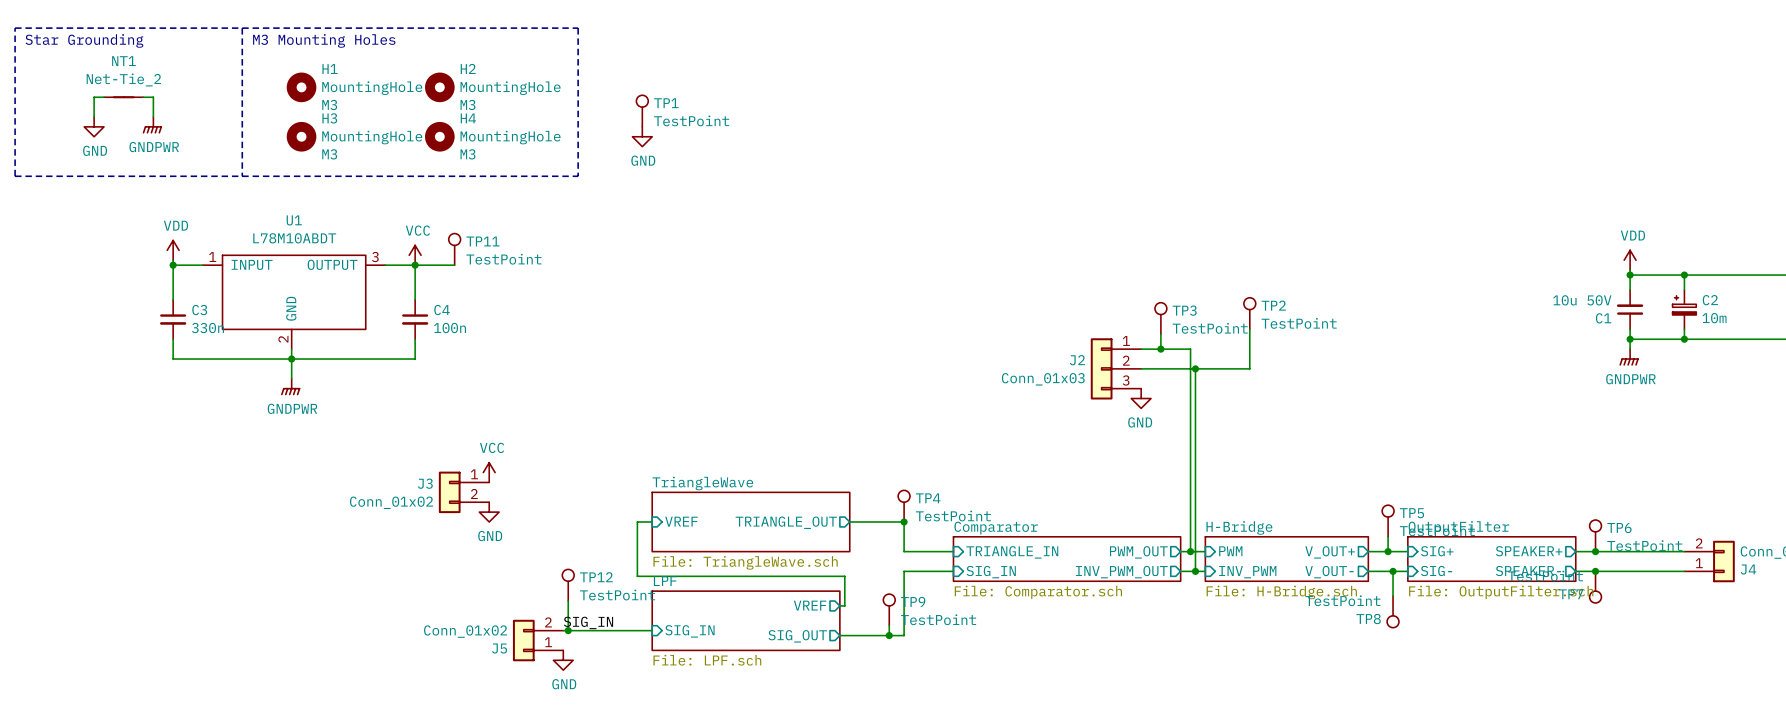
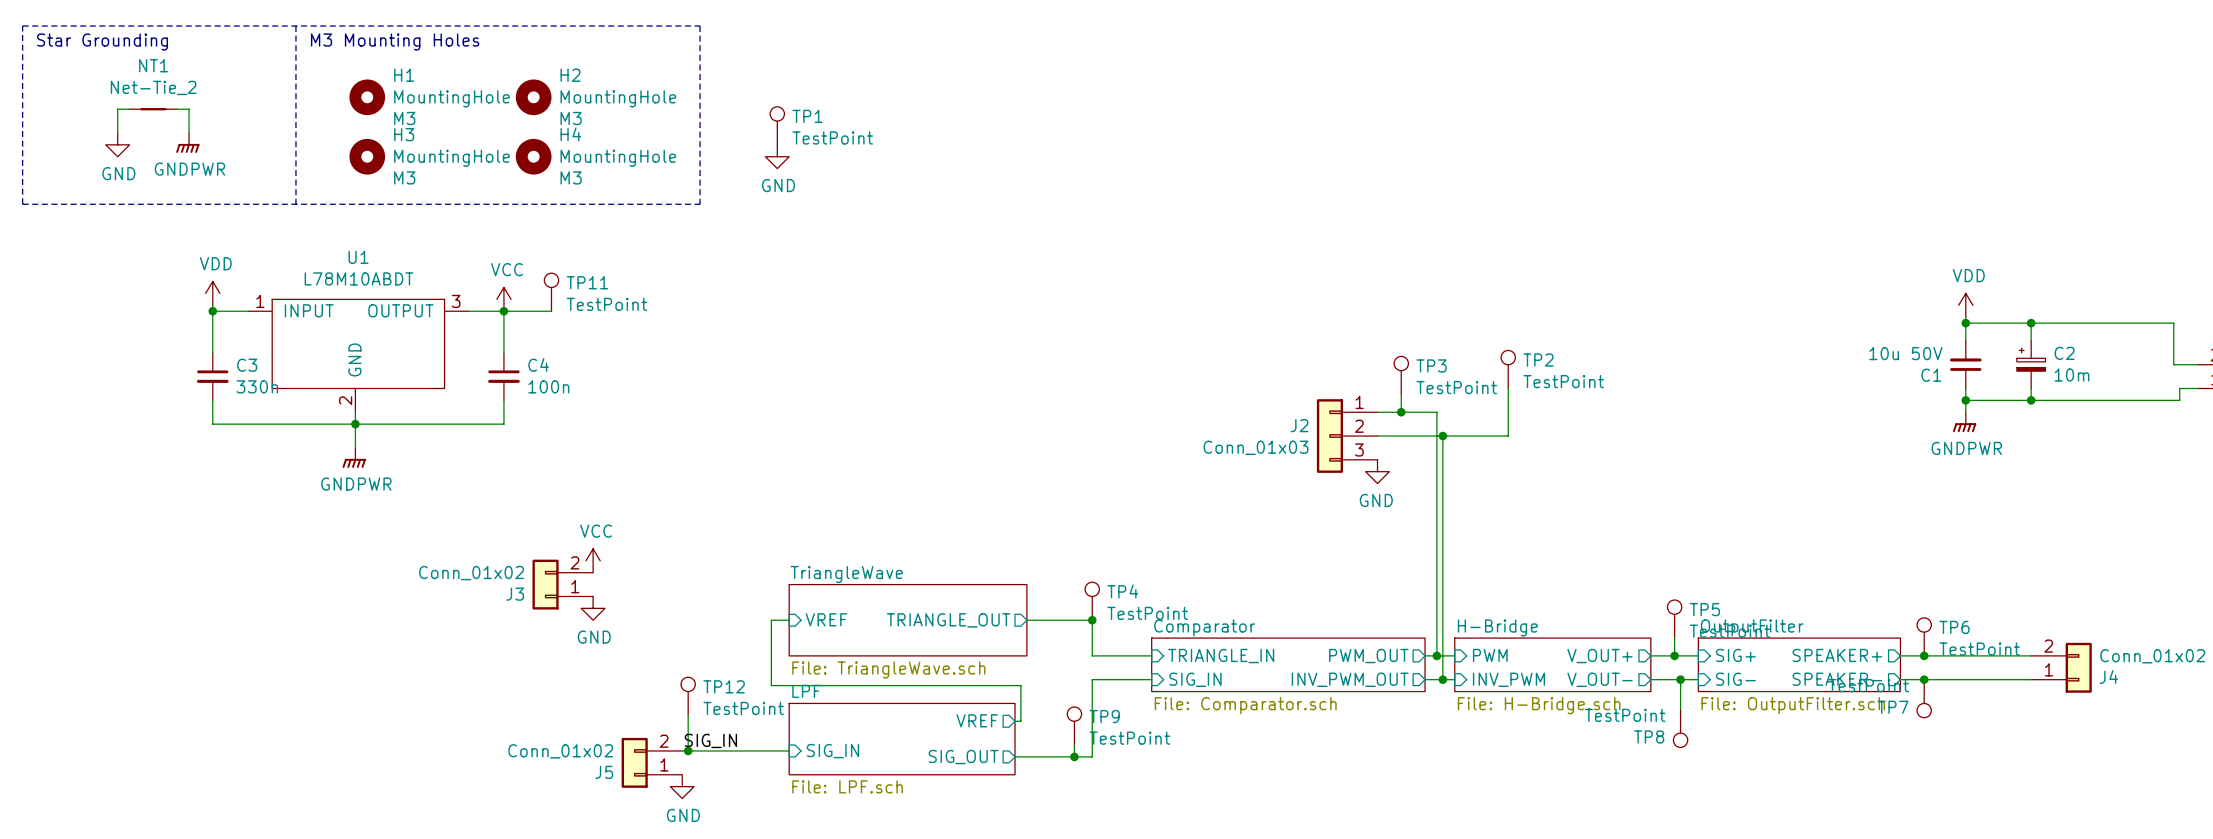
J3 flip: as is (449, 492) -> up-down (545, 584)

